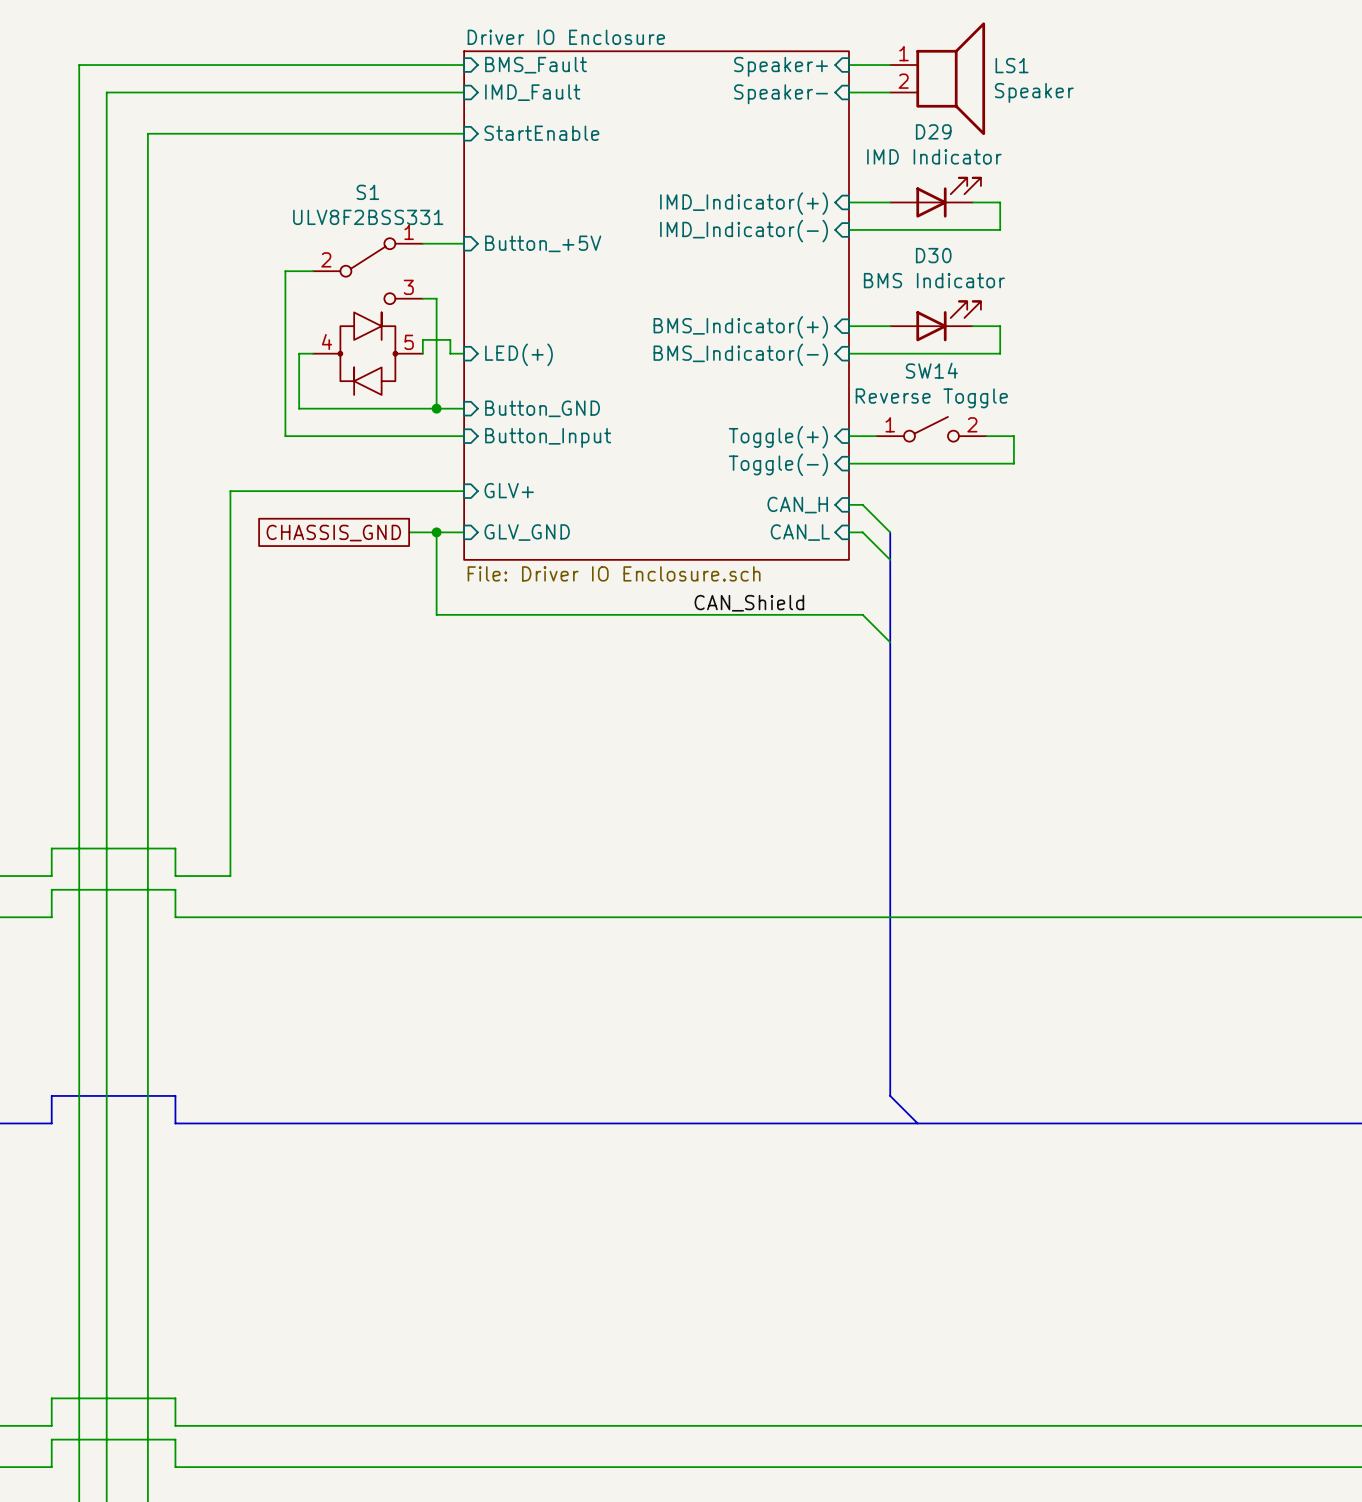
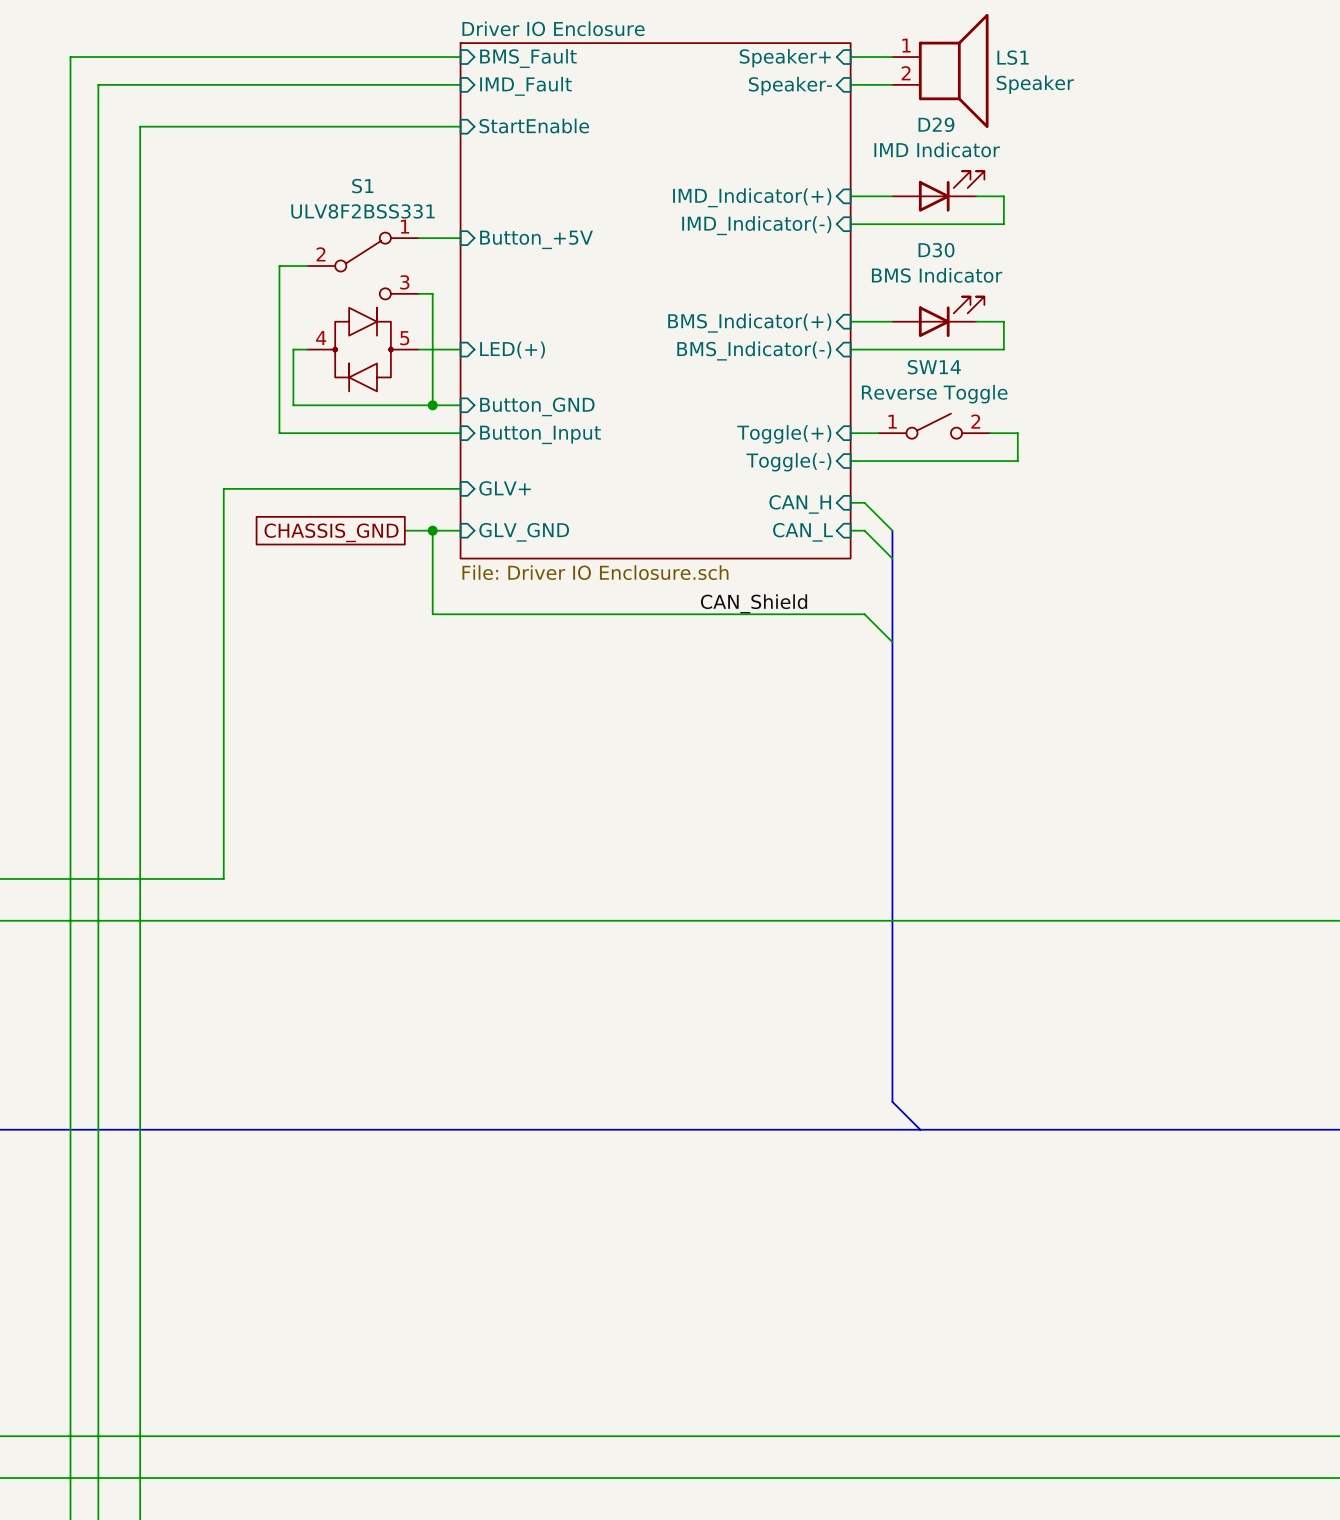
wire: (422, 353) (422, 339) (450, 339) (450, 353) -> (418, 349) (446, 349)
wire: (51, 876) (51, 848) (175, 848) (175, 876) -> (42, 878) (168, 878)
wire: (51, 917) (51, 889) (175, 889) (175, 917) -> (42, 920) (168, 920)
bus: (51, 1123) (51, 1095) (175, 1095) (175, 1123) -> (42, 1129) (168, 1129)
wire: (51, 1425) (51, 1398) (175, 1398) (175, 1425) -> (42, 1436) (168, 1436)
wire: (51, 1467) (51, 1439) (175, 1439) (175, 1467) -> (42, 1478) (168, 1478)

